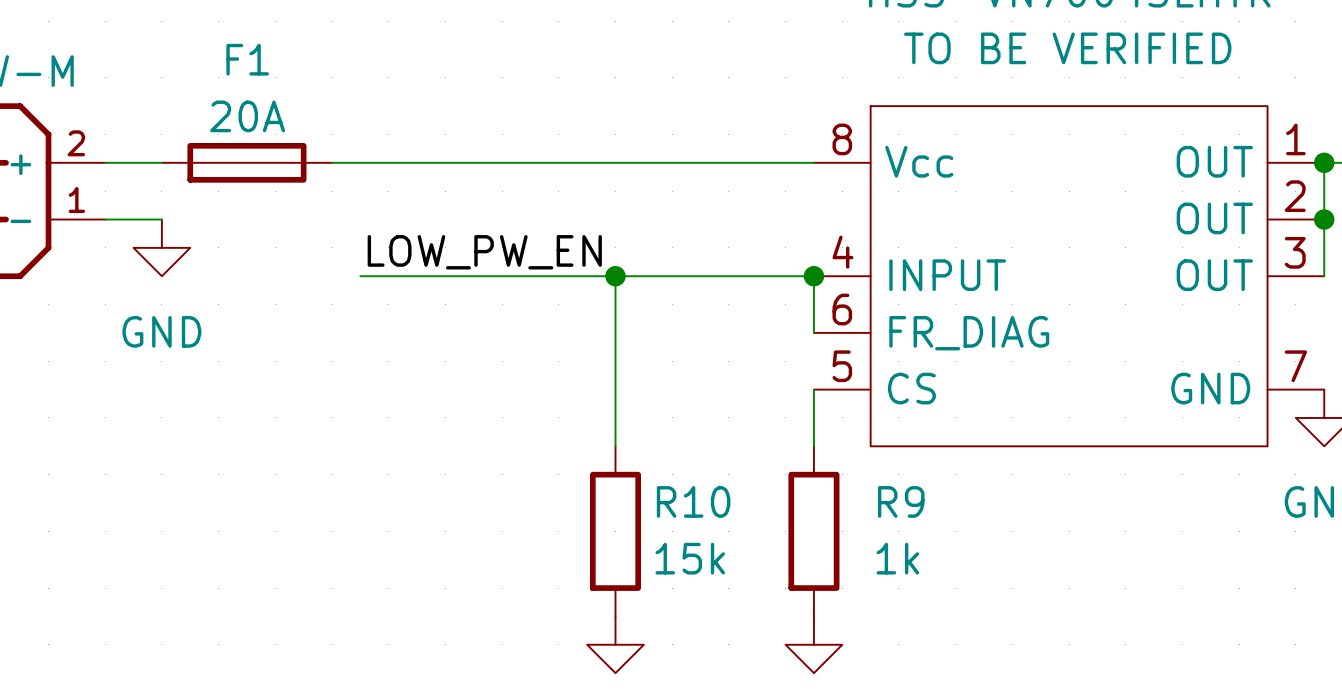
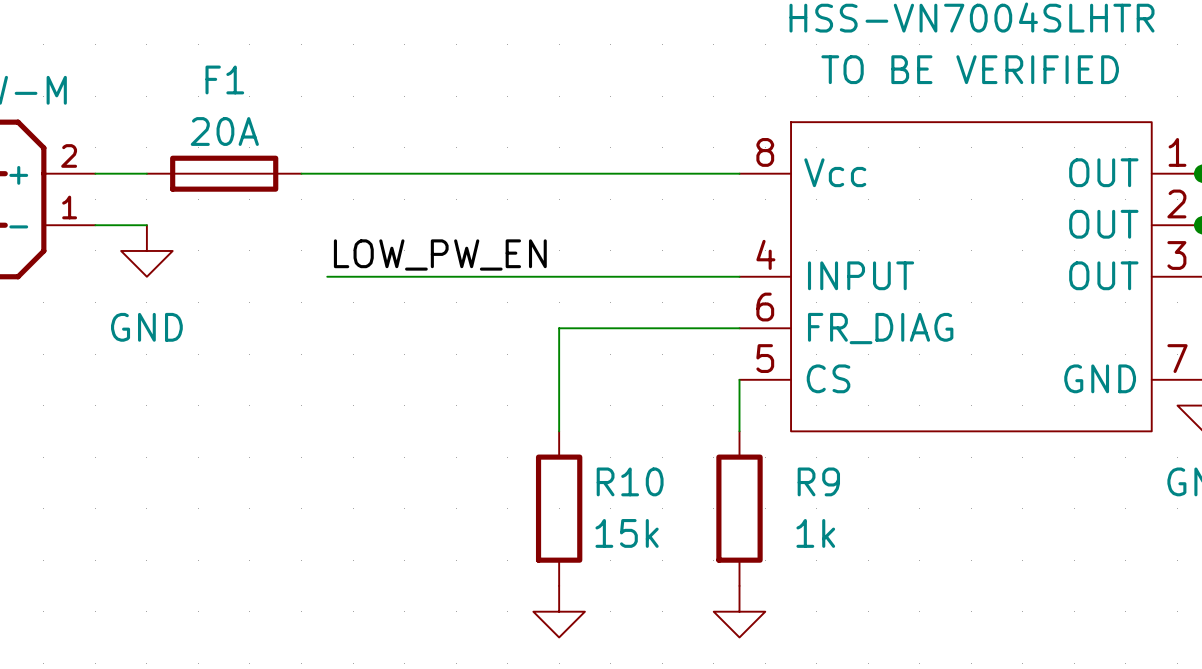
wire: (615, 276) (615, 332) -> (739, 328) (559, 328)
junction: (615, 276) -> none
wire: (813, 276) (813, 332) -> none
junction: (813, 276) -> none

